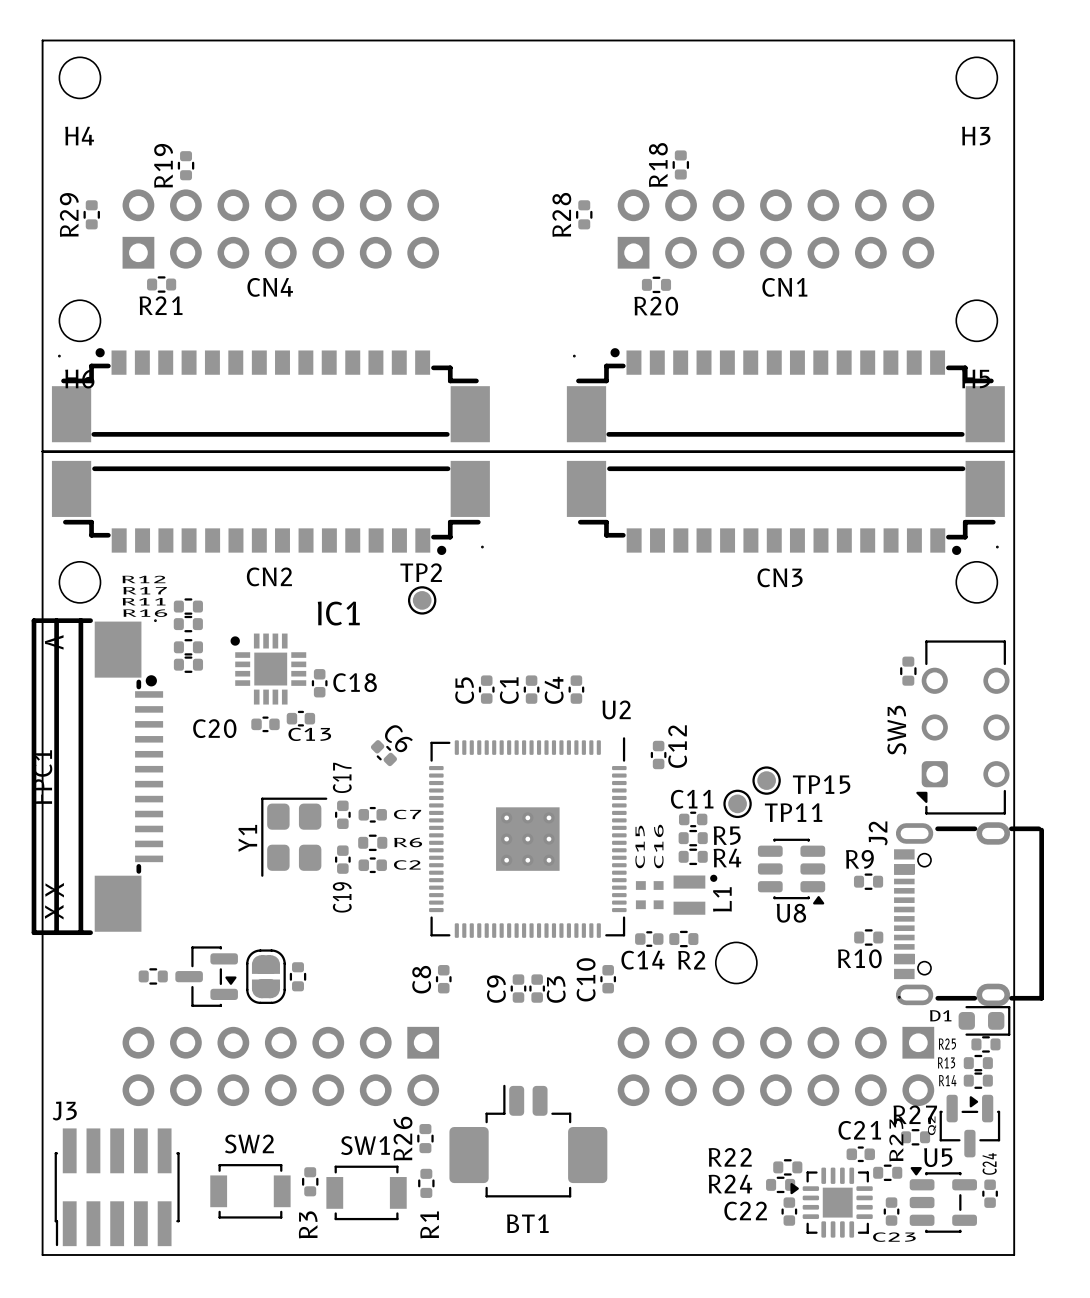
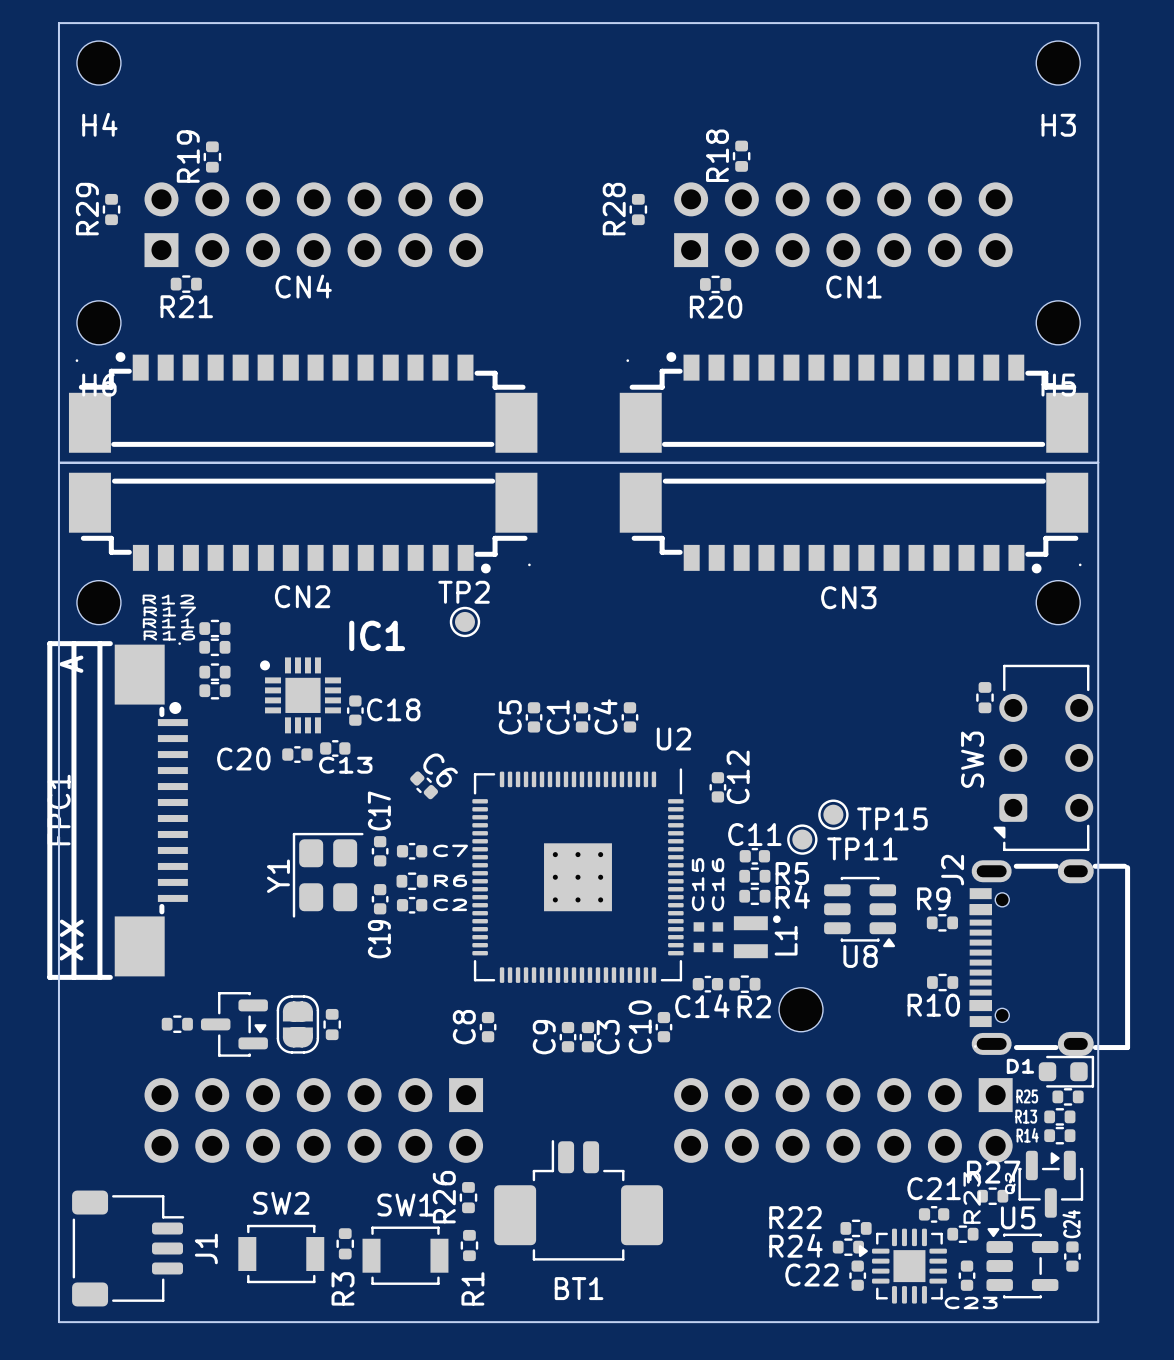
J1: none -> (128, 1248)
J3: (117, 1187) -> none

